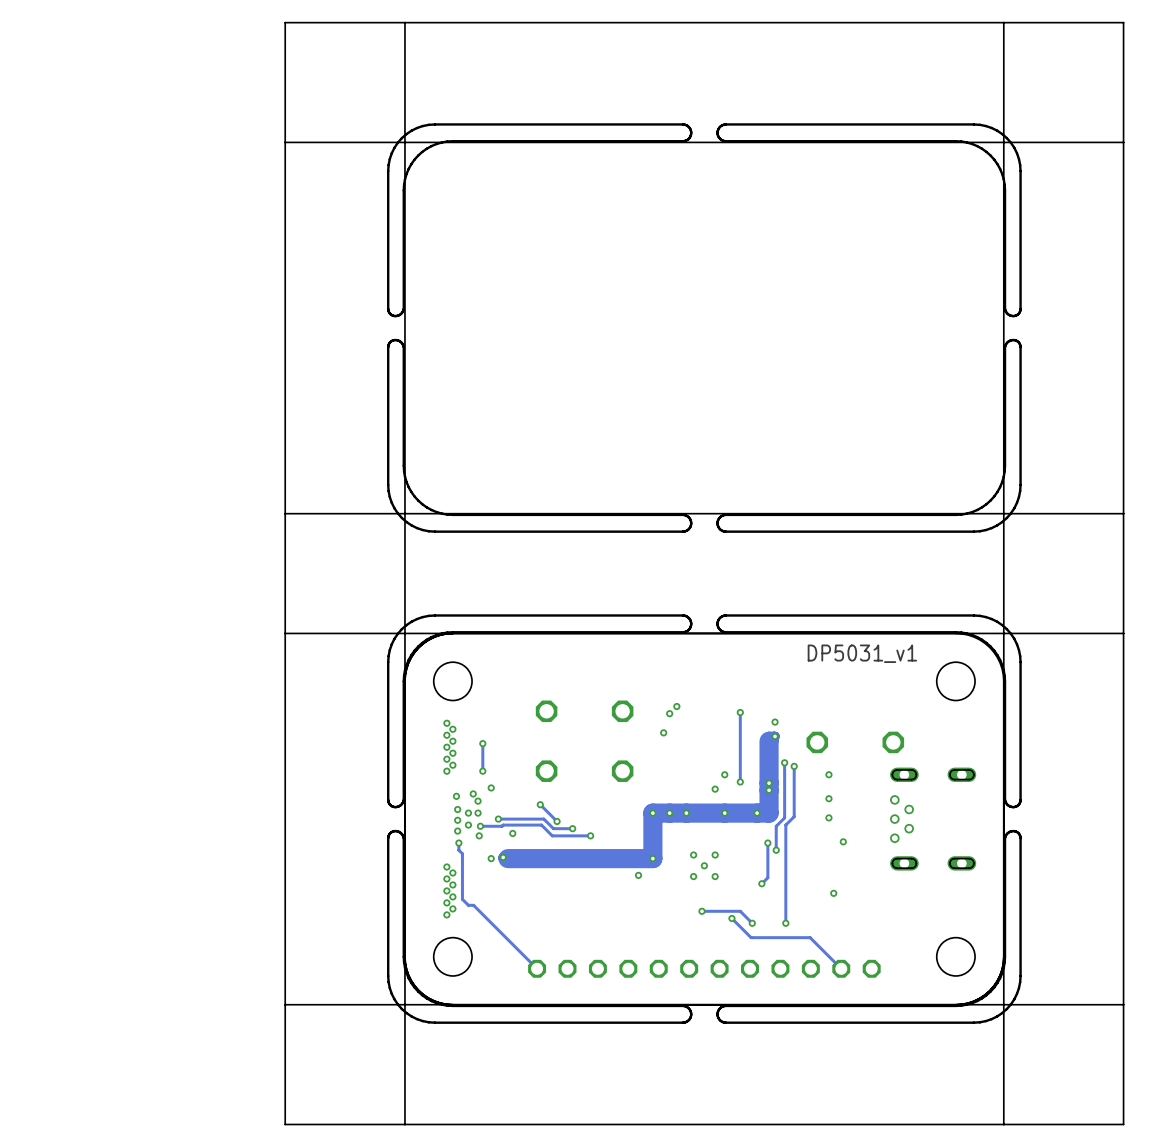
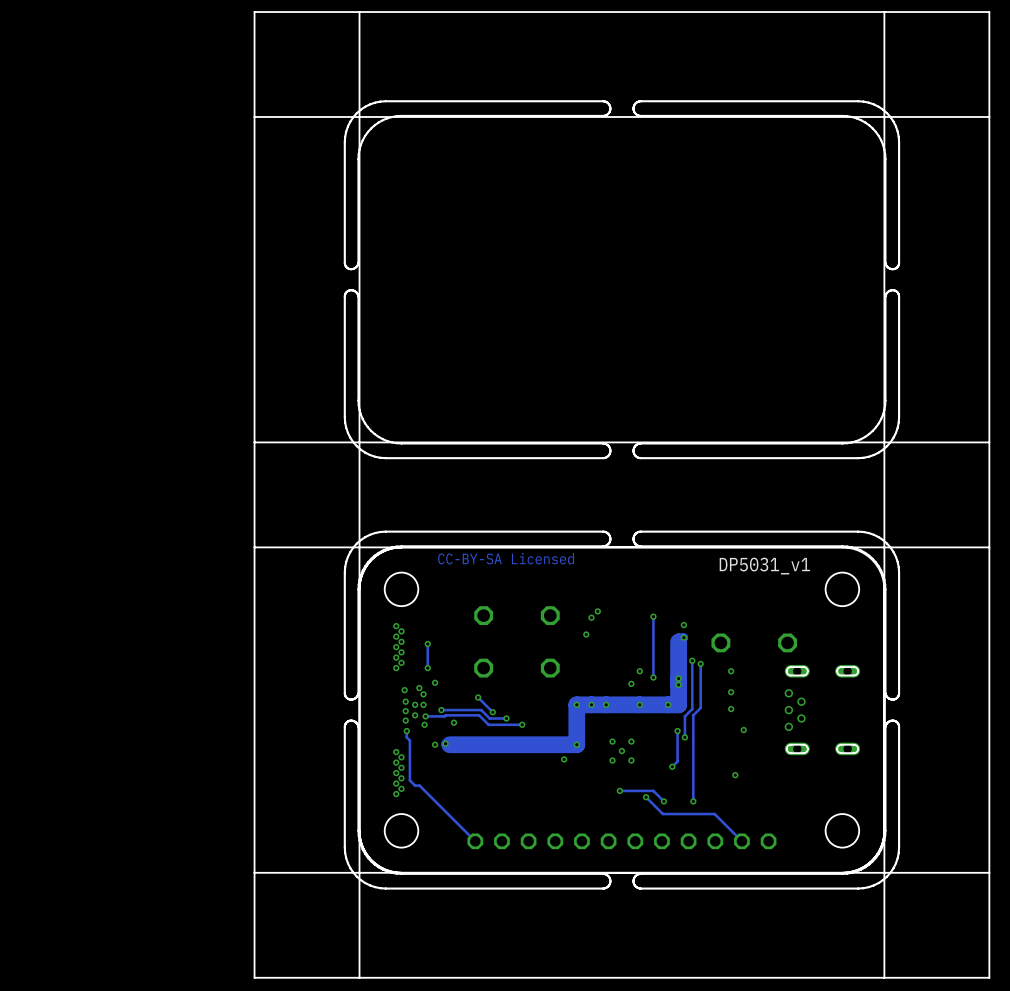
text: none -> CC-BY-SA Licensed (506, 558)

